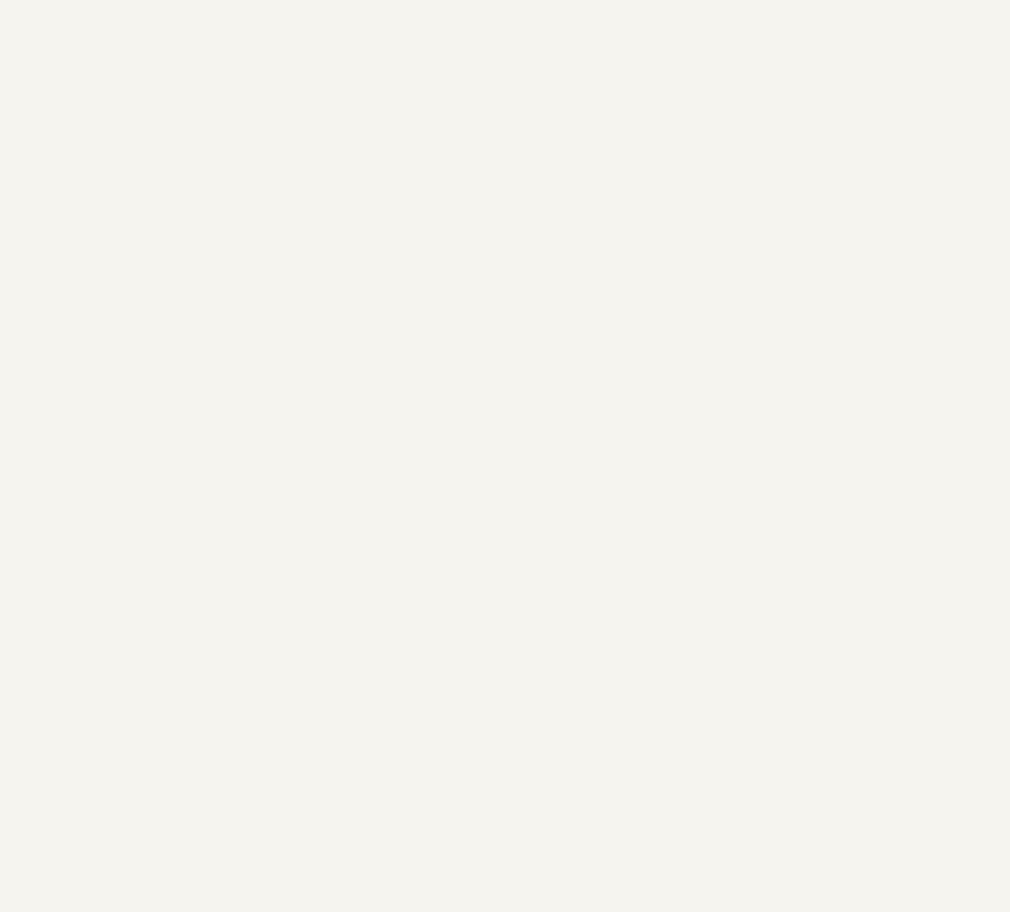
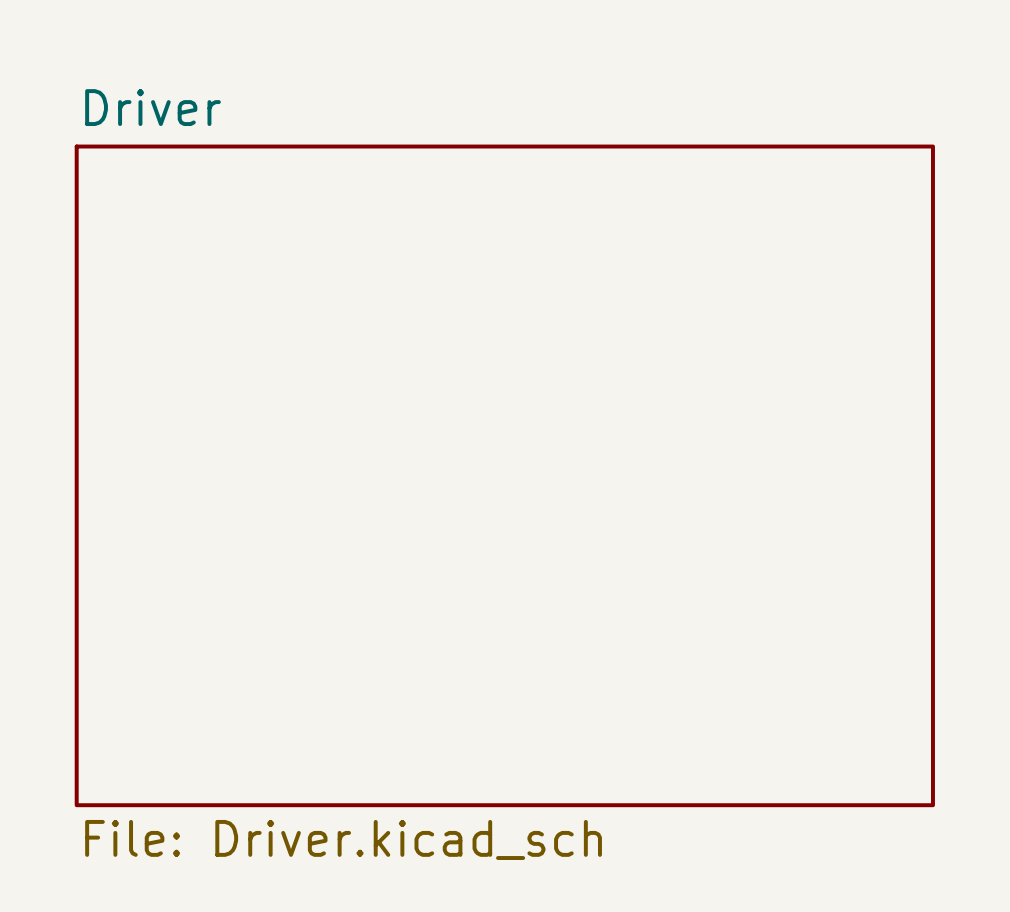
sheet Driver: none -> File: Driver.kicad_sch (504, 475)

